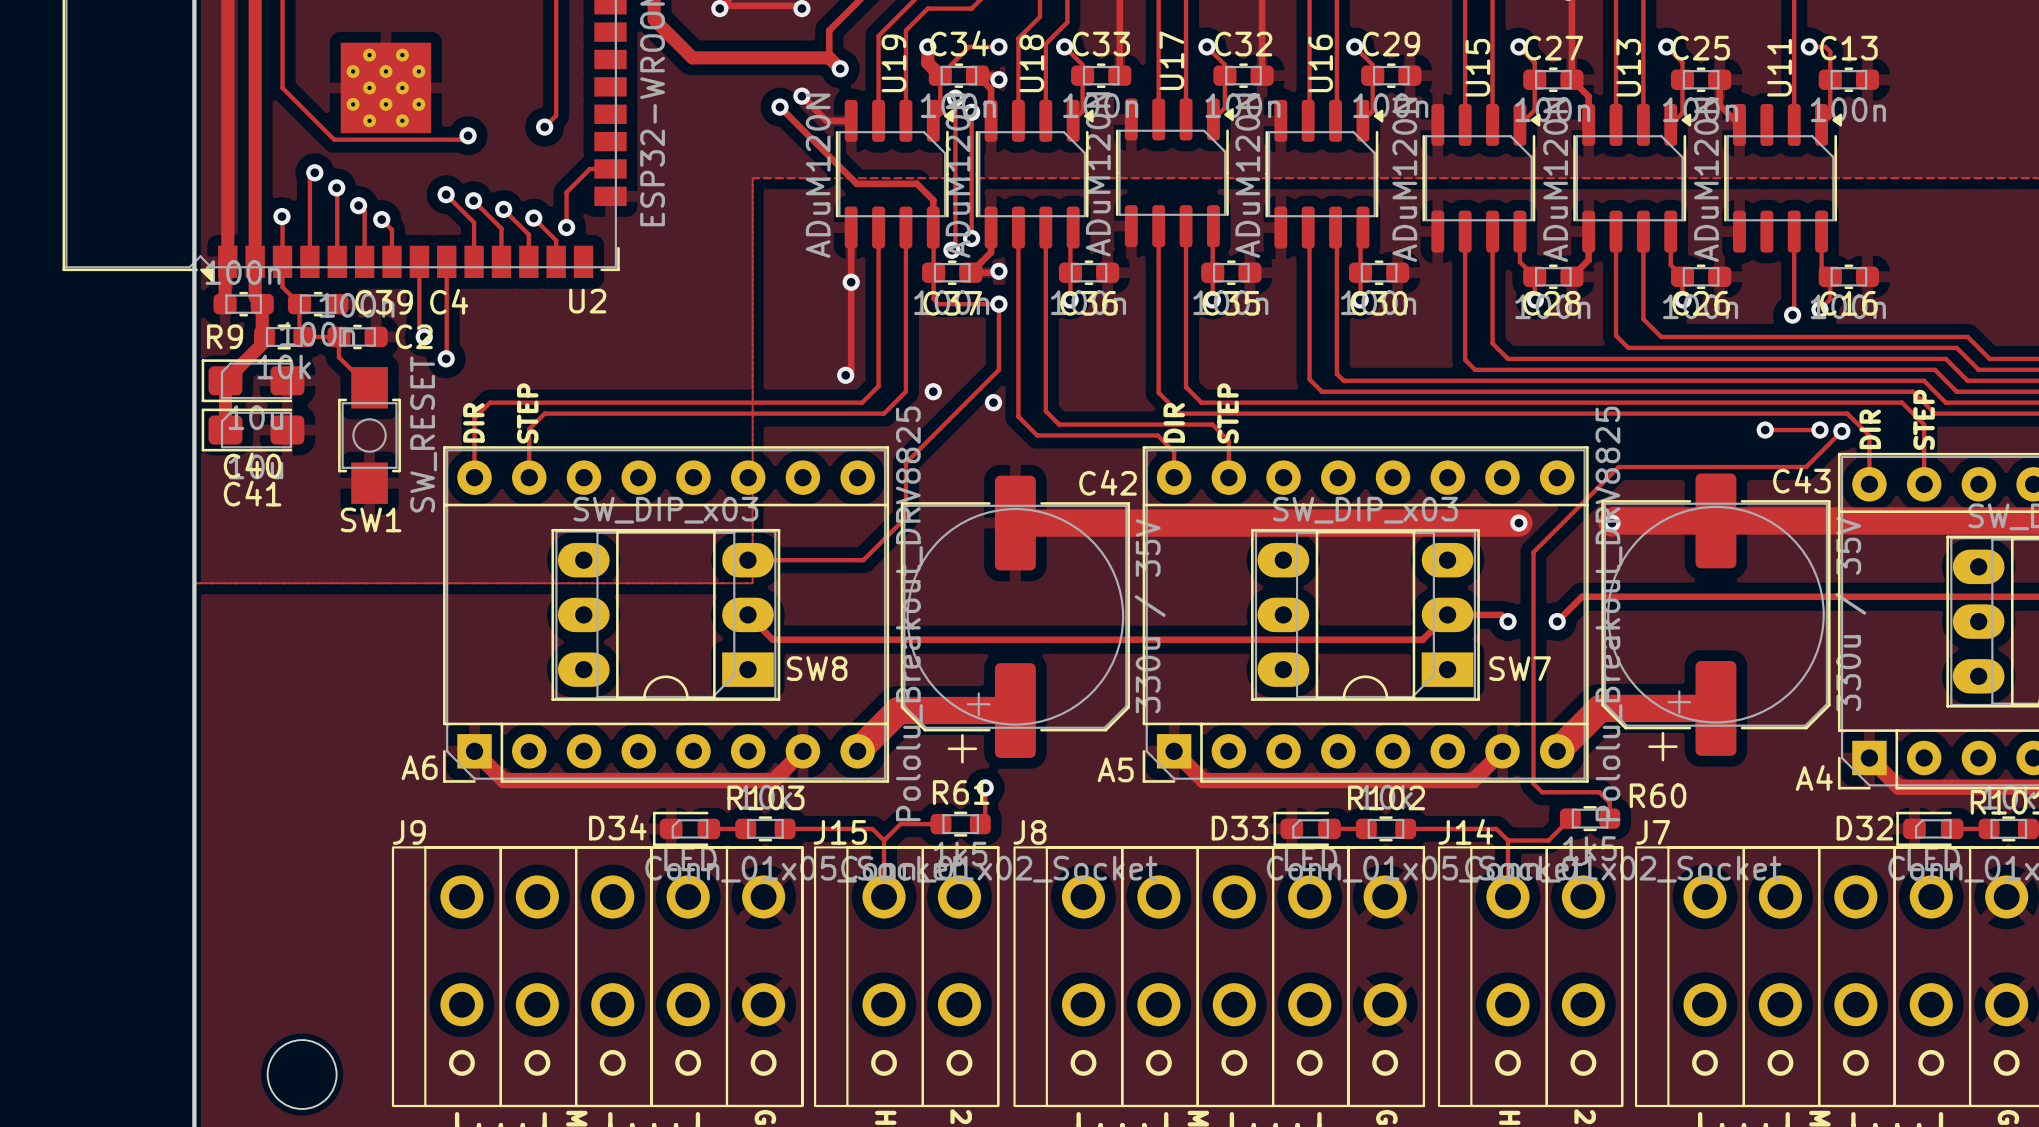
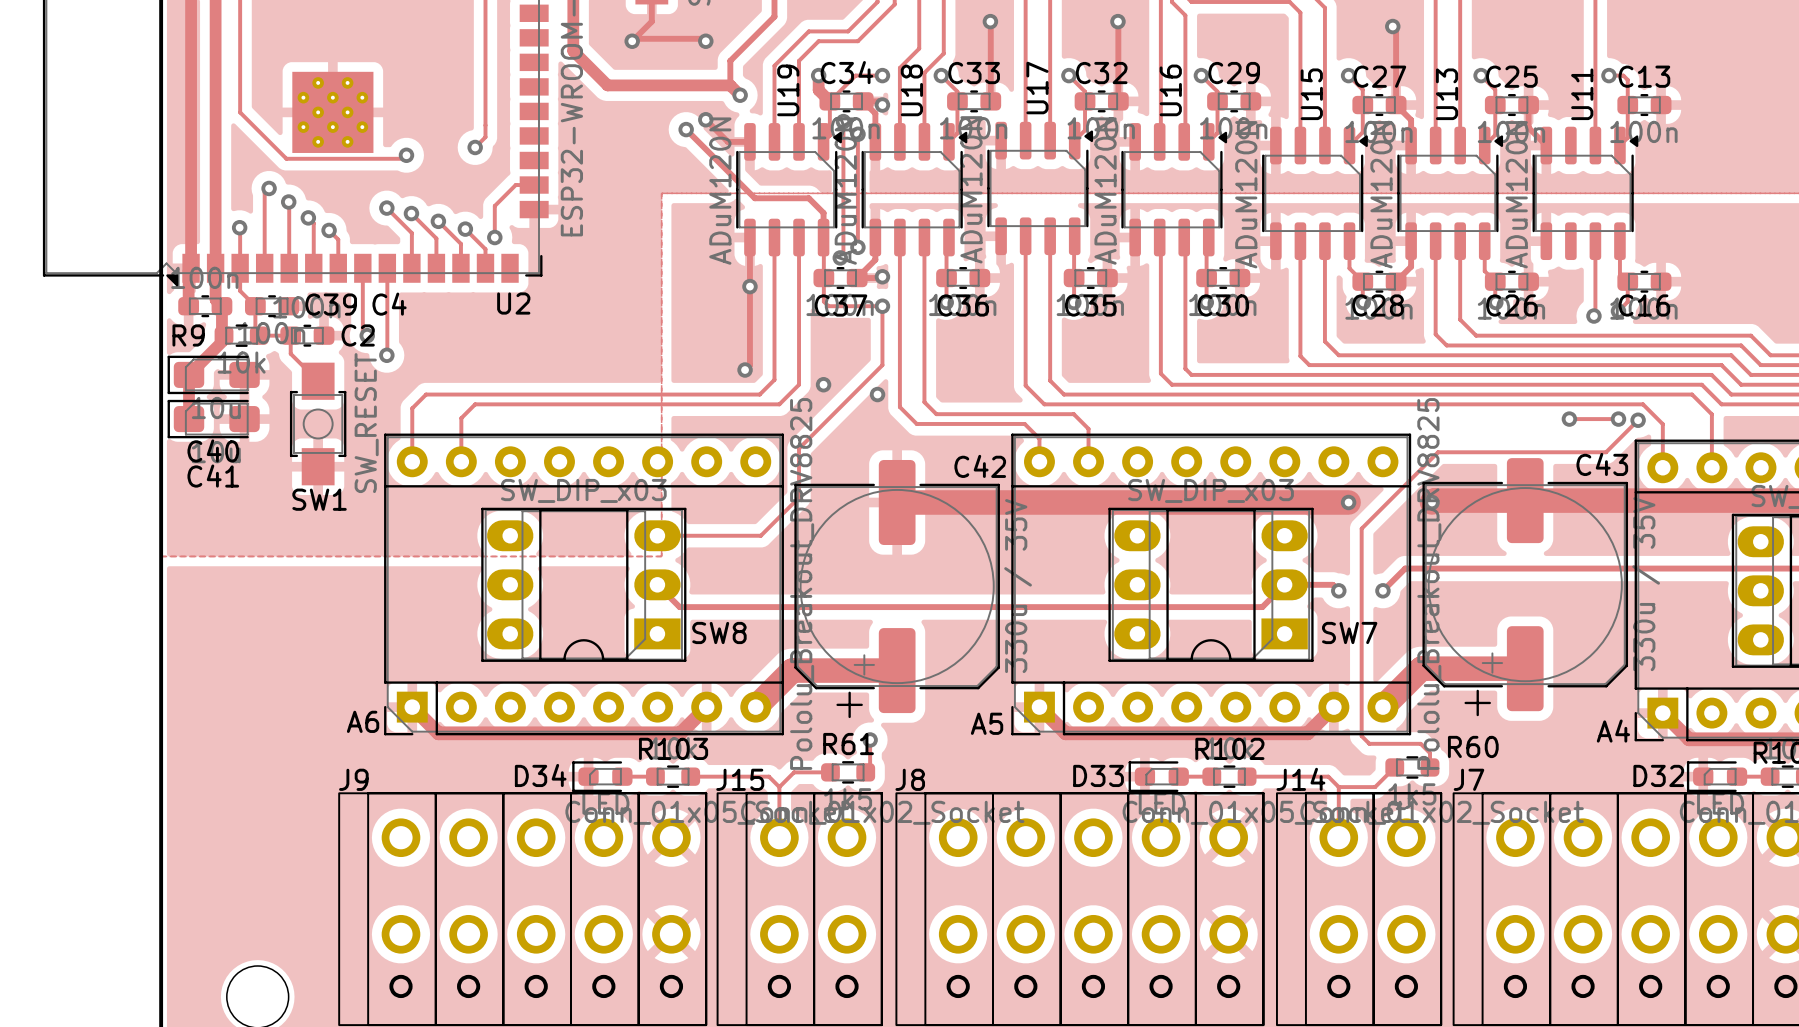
text: STEP (527, 413) -> none
text: STEP (1228, 413) -> none
text: STEP (1924, 419) -> none
text: DIR (473, 422) -> none
text: DIR (1174, 422) -> none
text: DIR (1870, 429) -> none

